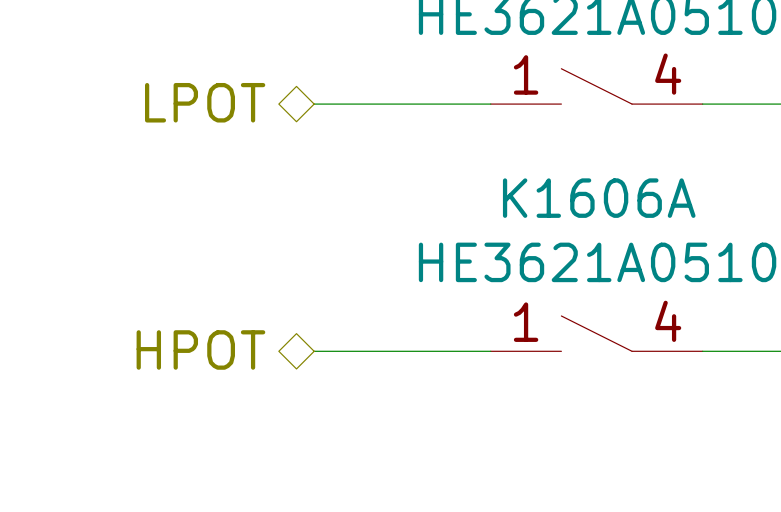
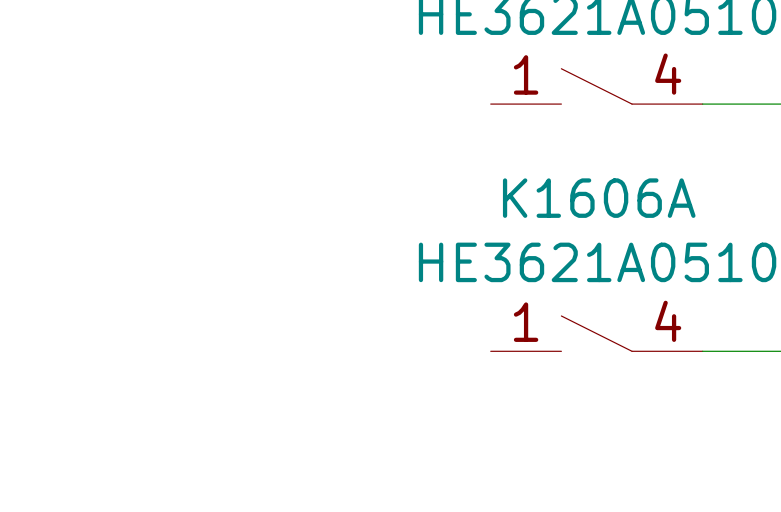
hierarchical label: LPOT (205, 102) -> none
wire: (314, 104) (490, 104) -> none
hierarchical label: HPOT (200, 349) -> none
wire: (314, 351) (490, 351) -> none

